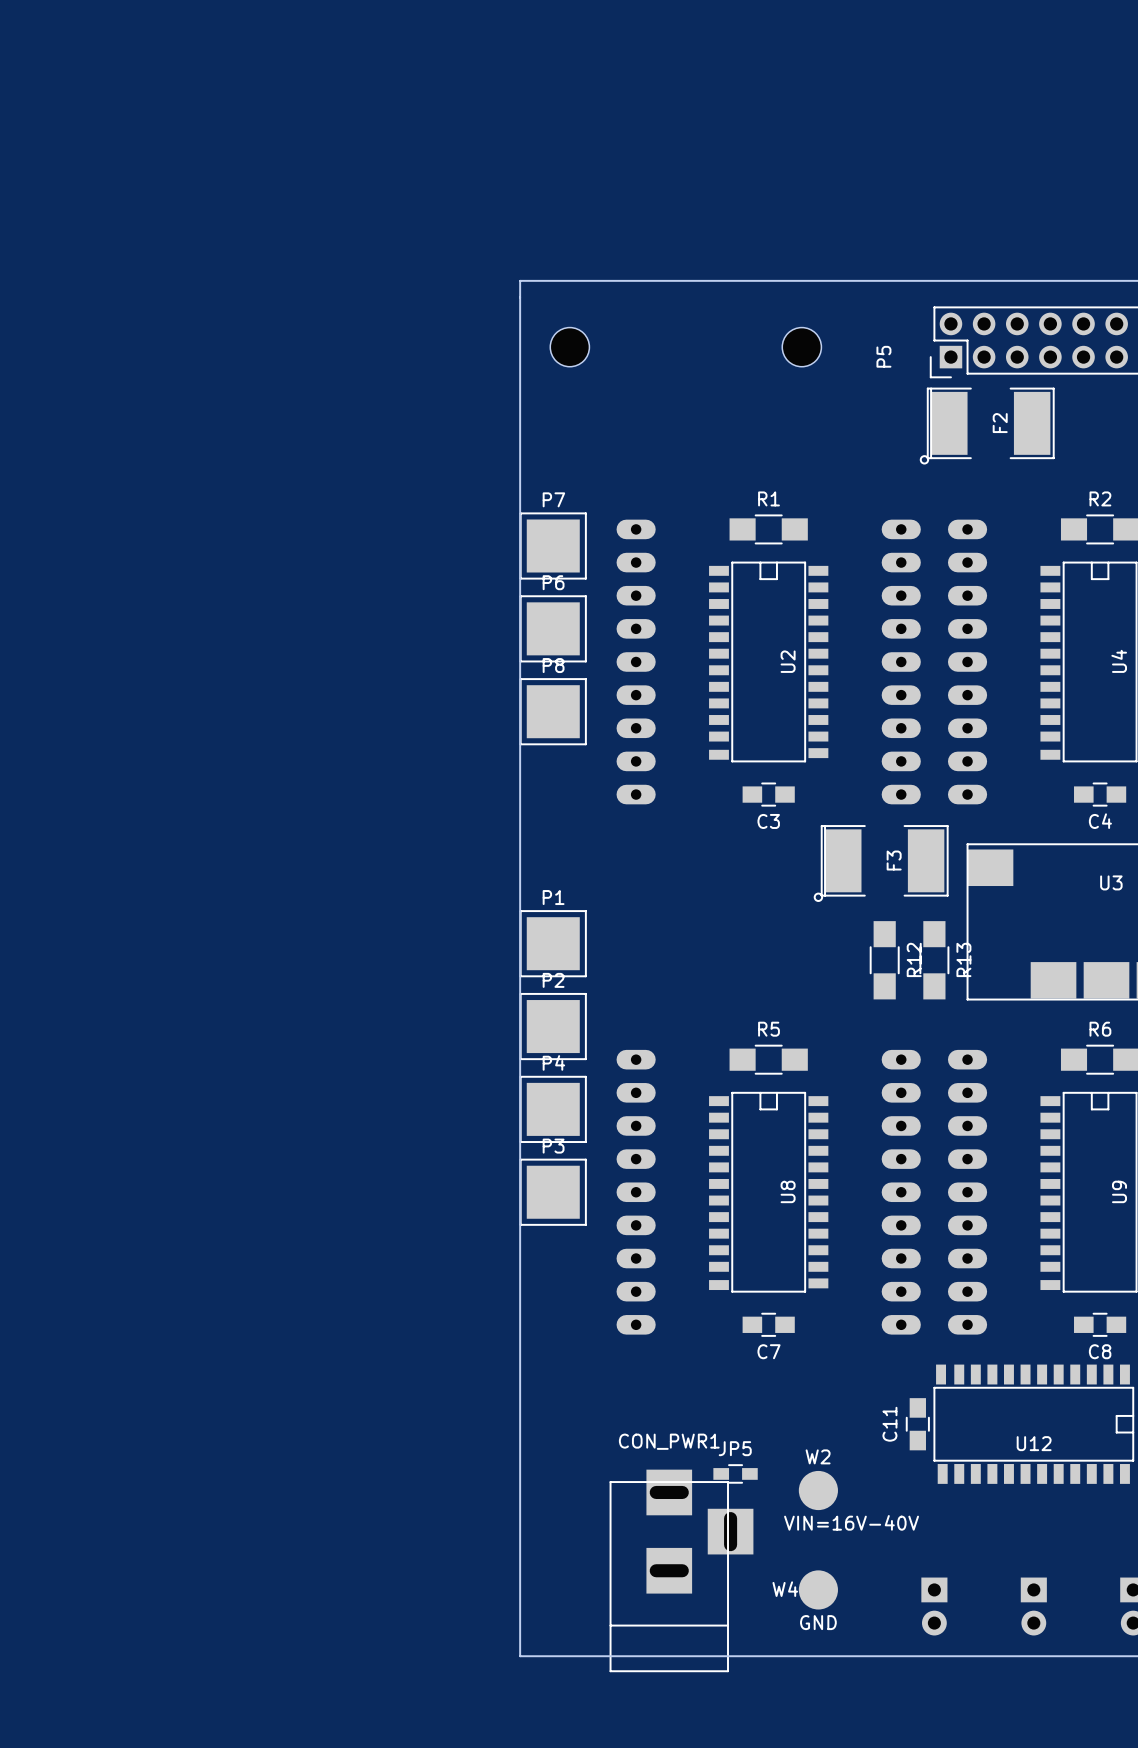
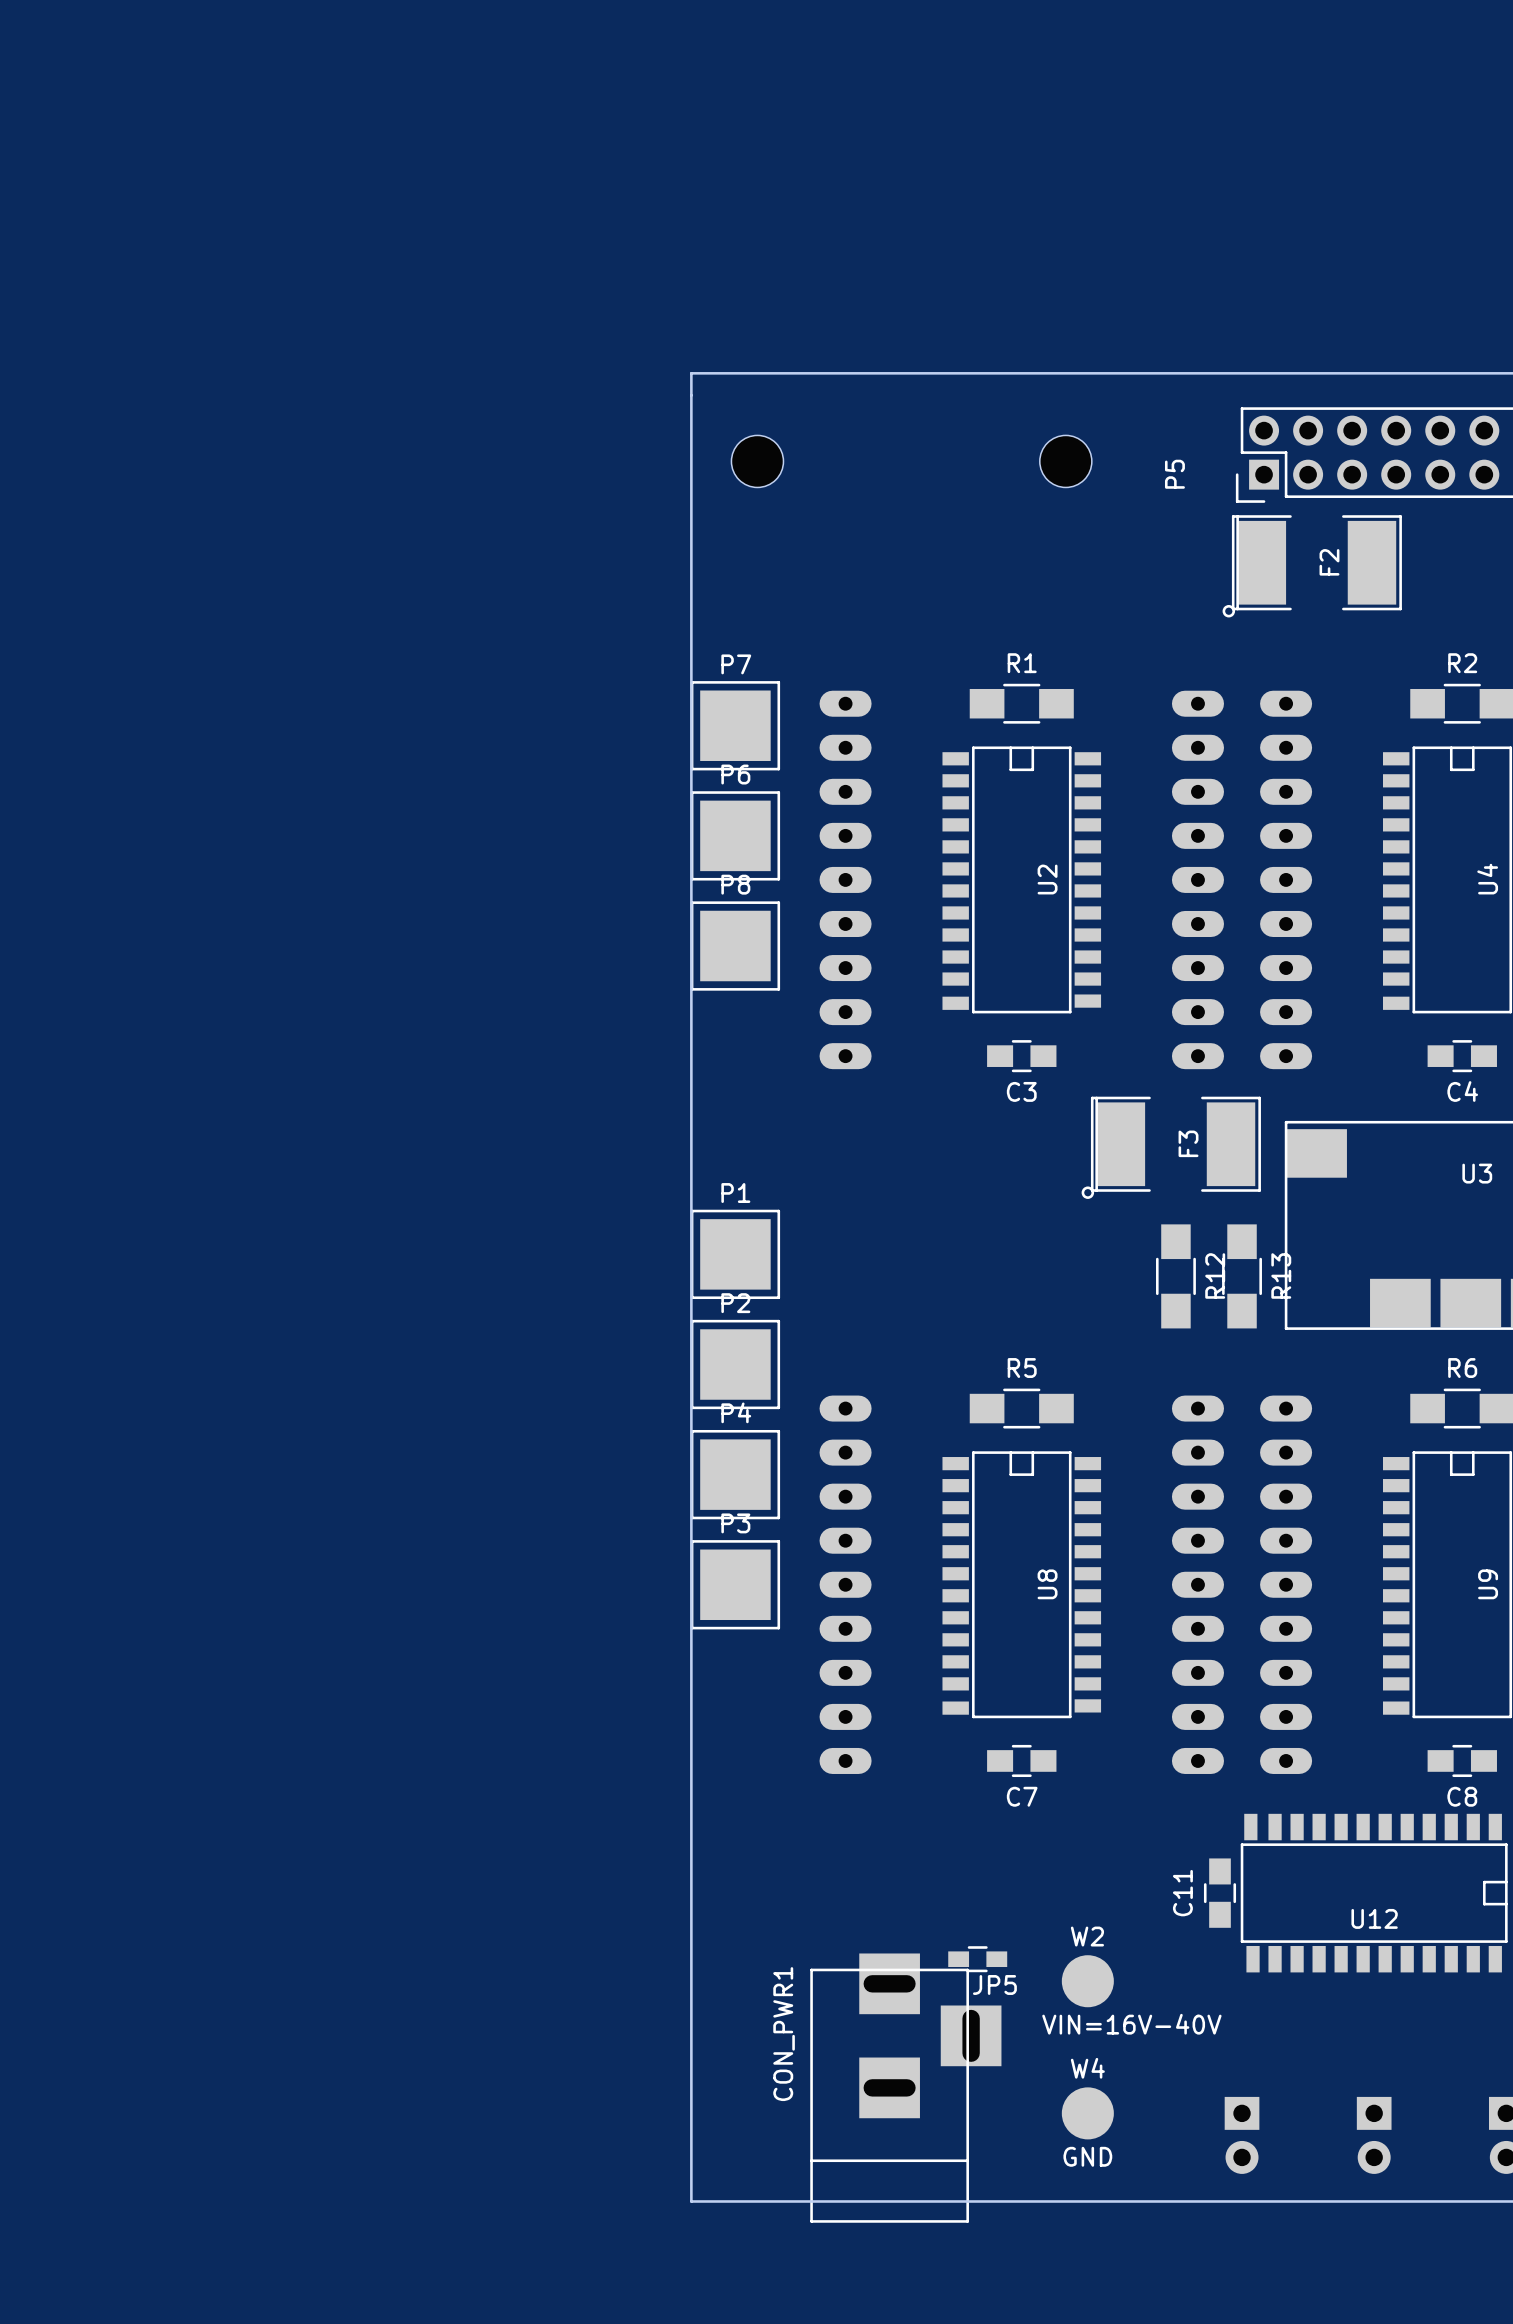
CON_PWR1 name rotation: 0° (669, 1441) -> 90° counterclockwise (784, 2034)
JP5 name position: JP5 (735, 1448) -> JP5 (994, 1984)
W4 name position: W4 (785, 1589) -> W4 (1087, 2068)

